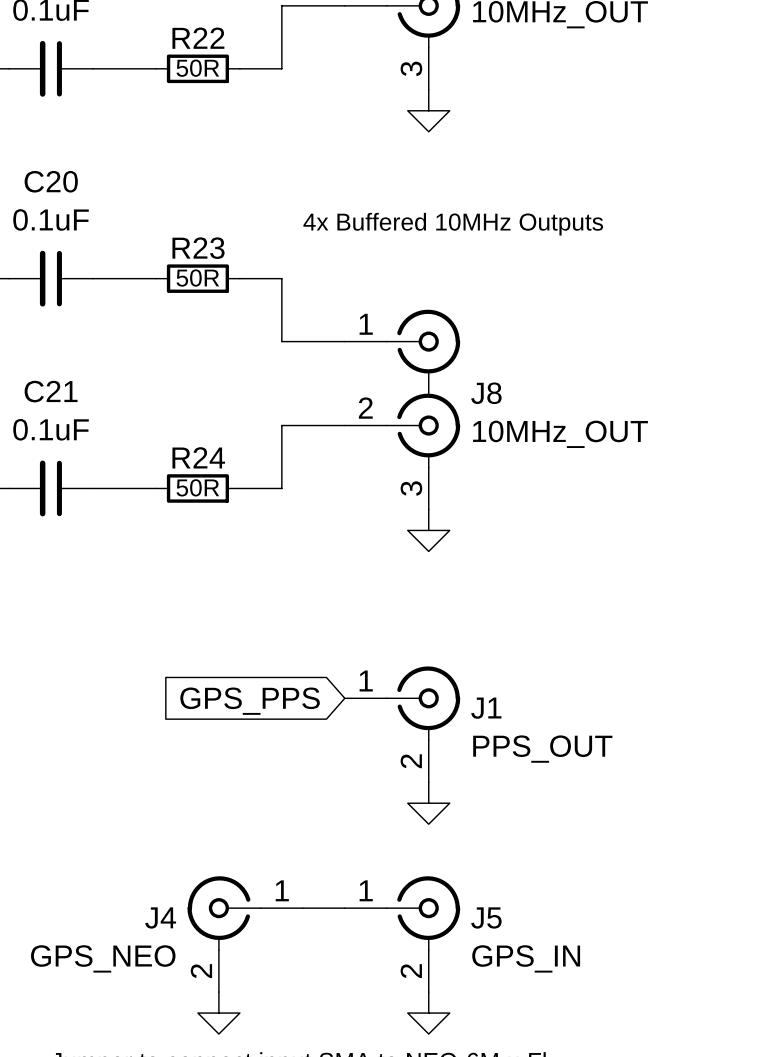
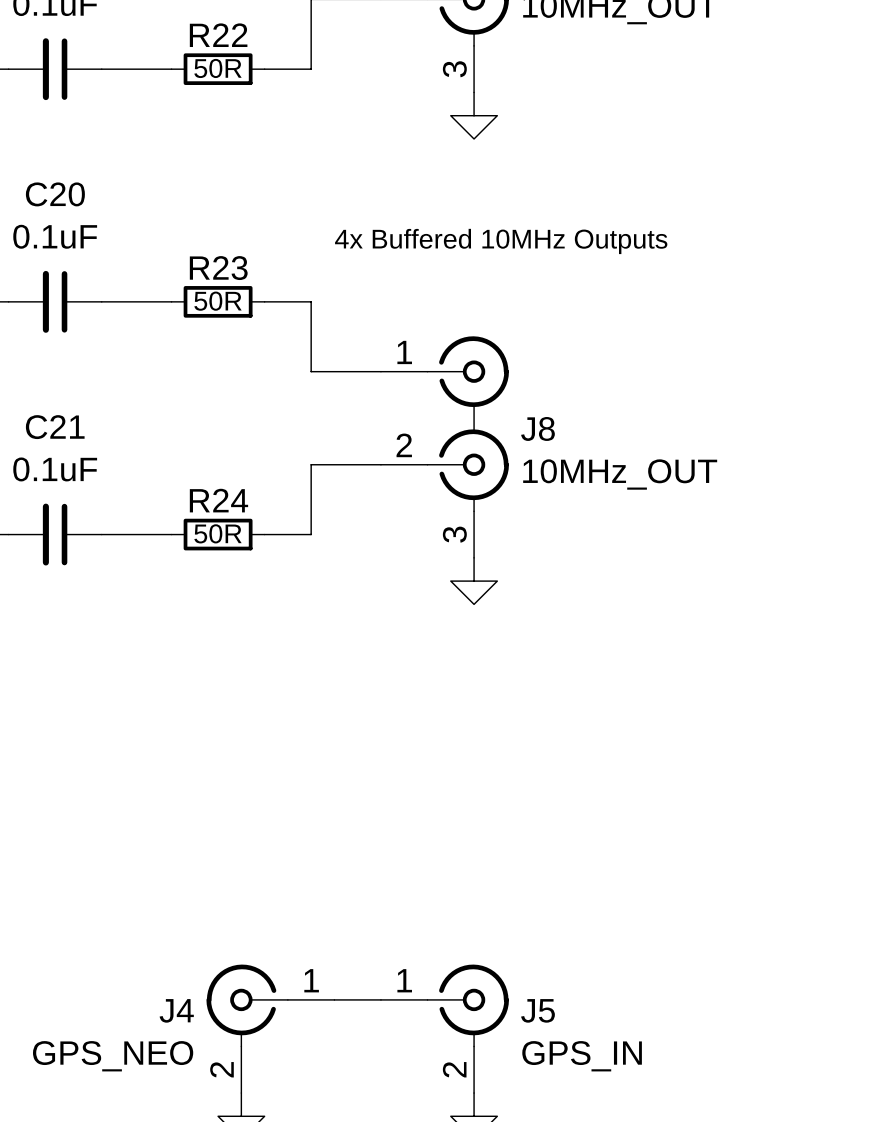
global label: GPS_PPS (250, 701) -> none
J1: PPS_OUT (402, 724) -> none
power symbol: (428, 803) -> none

